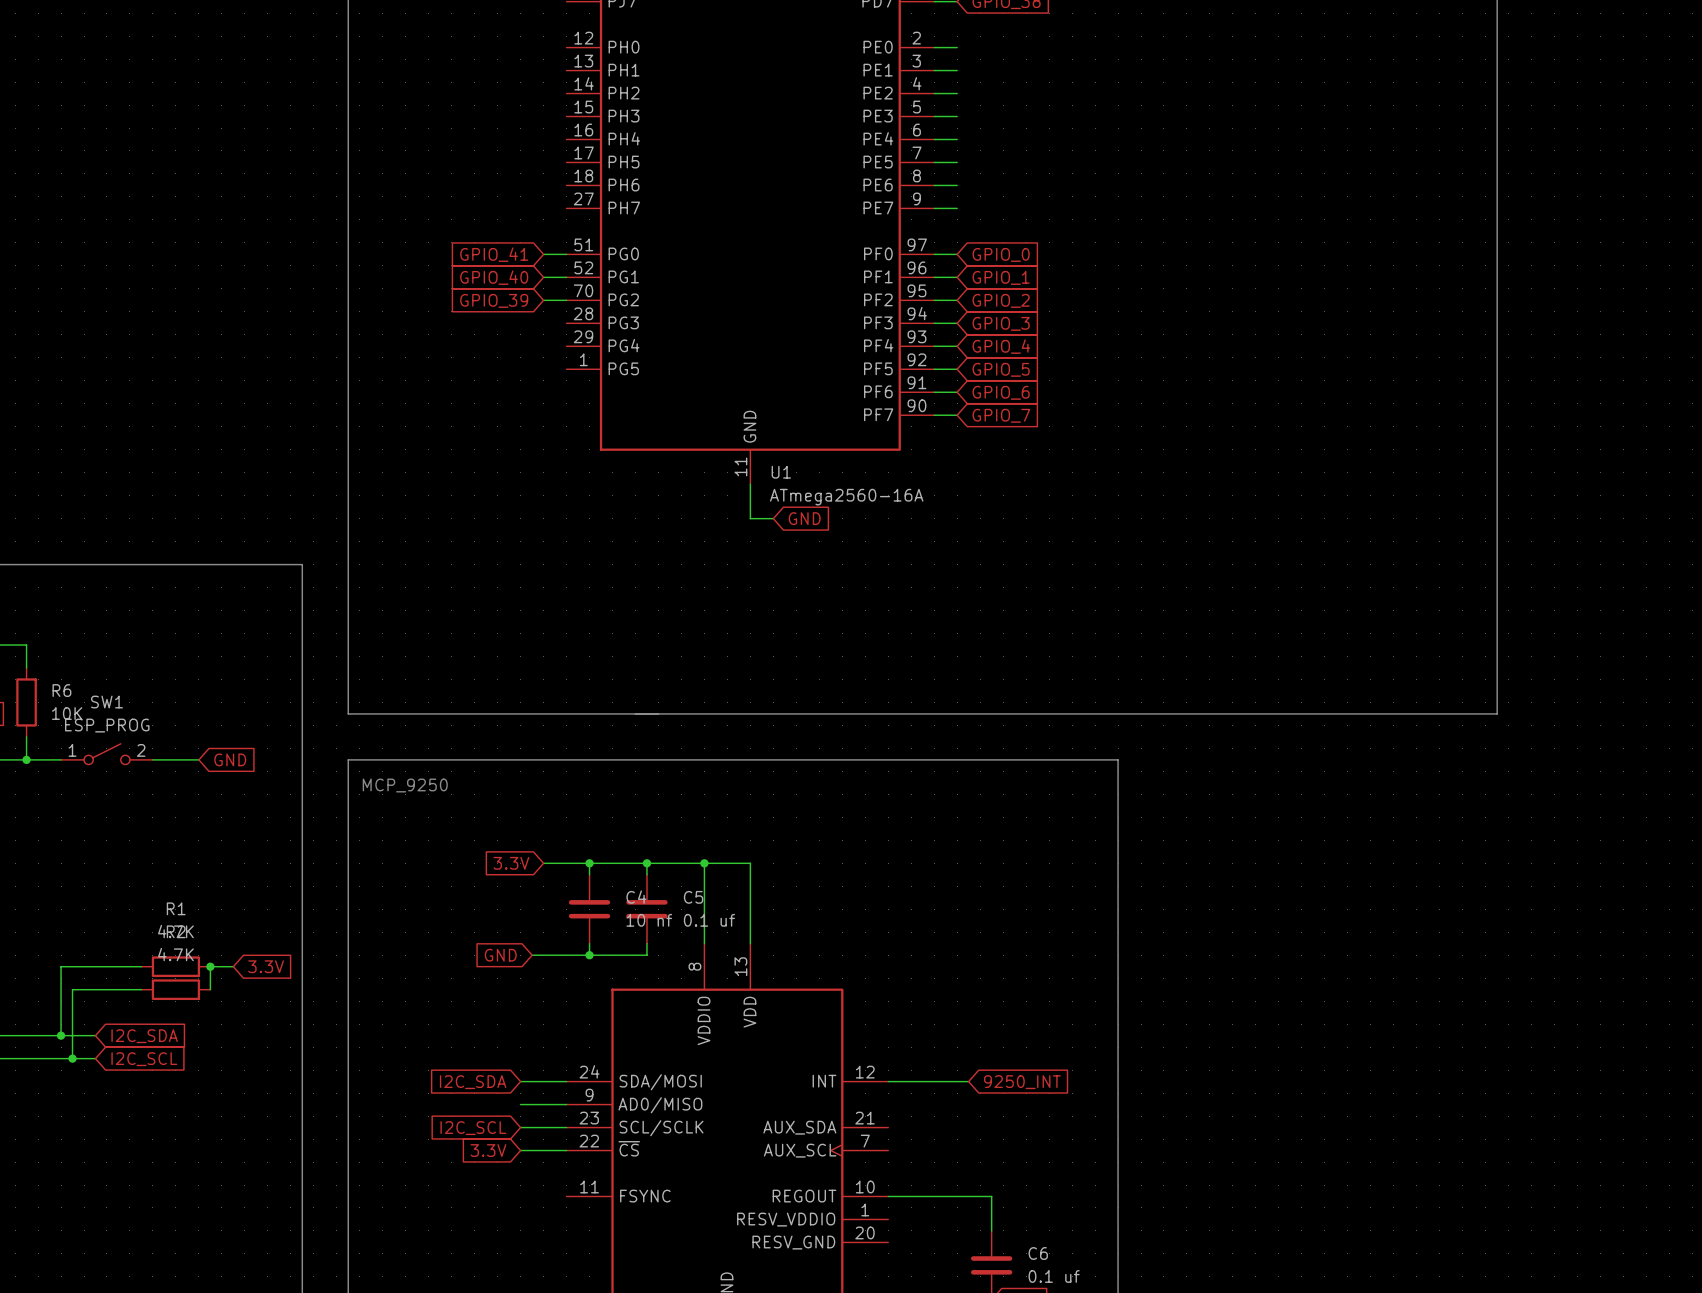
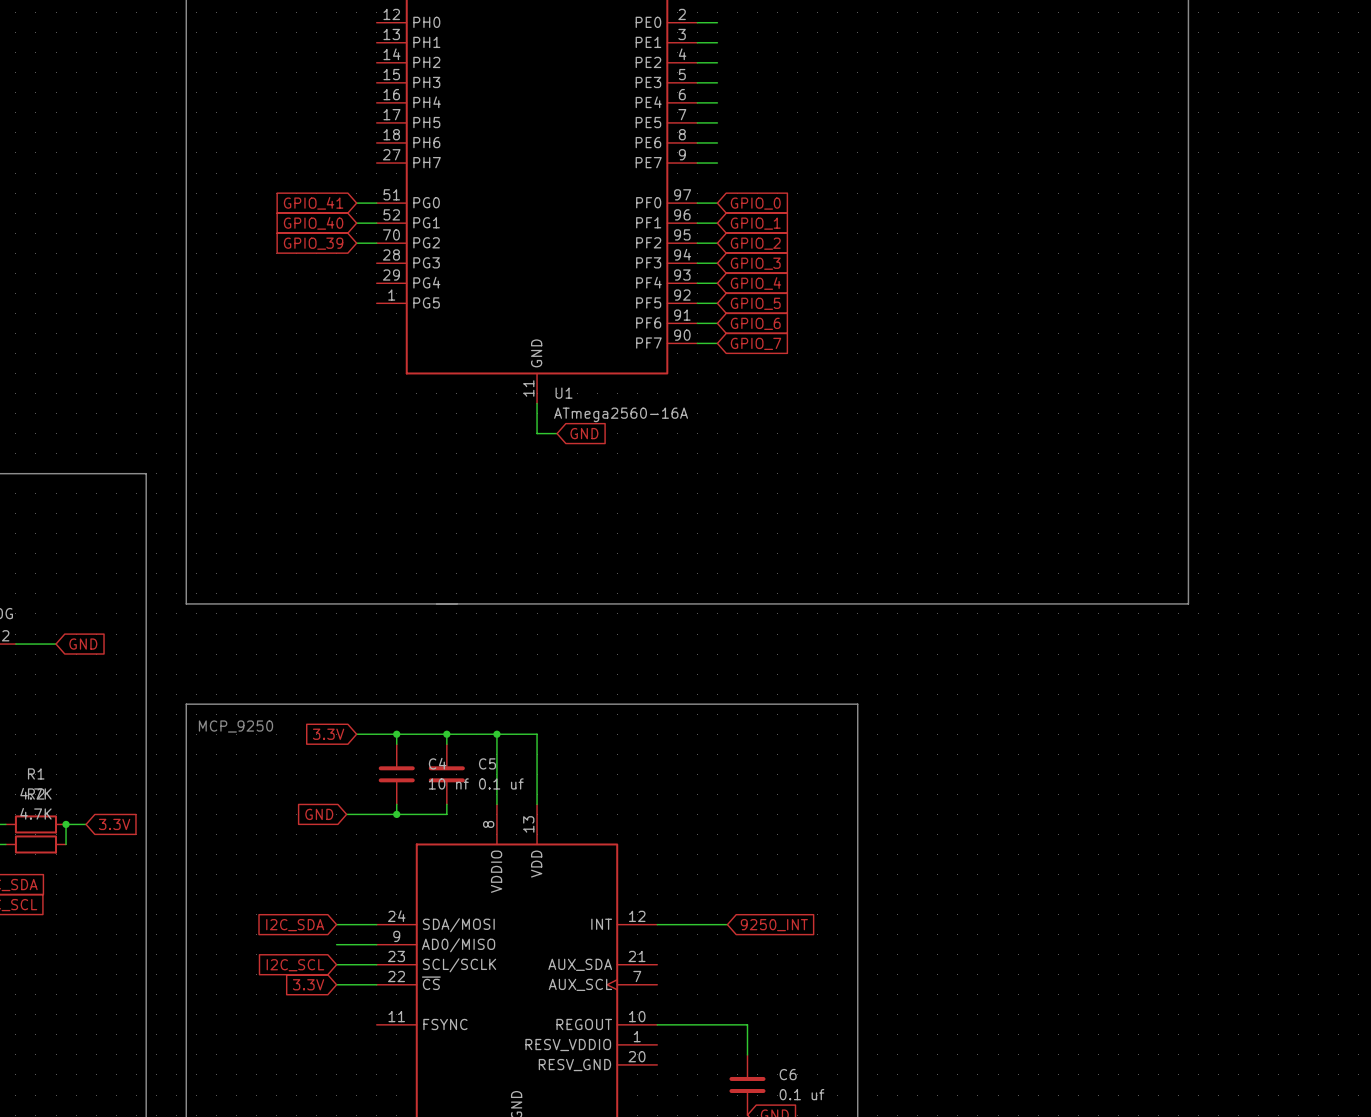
text position: MCP_9250 (405, 785) -> MCP_9250 (235, 726)
line: (348, 828) (348, 759) (1118, 759) (1118, 828) -> (186, 704) (857, 704)

